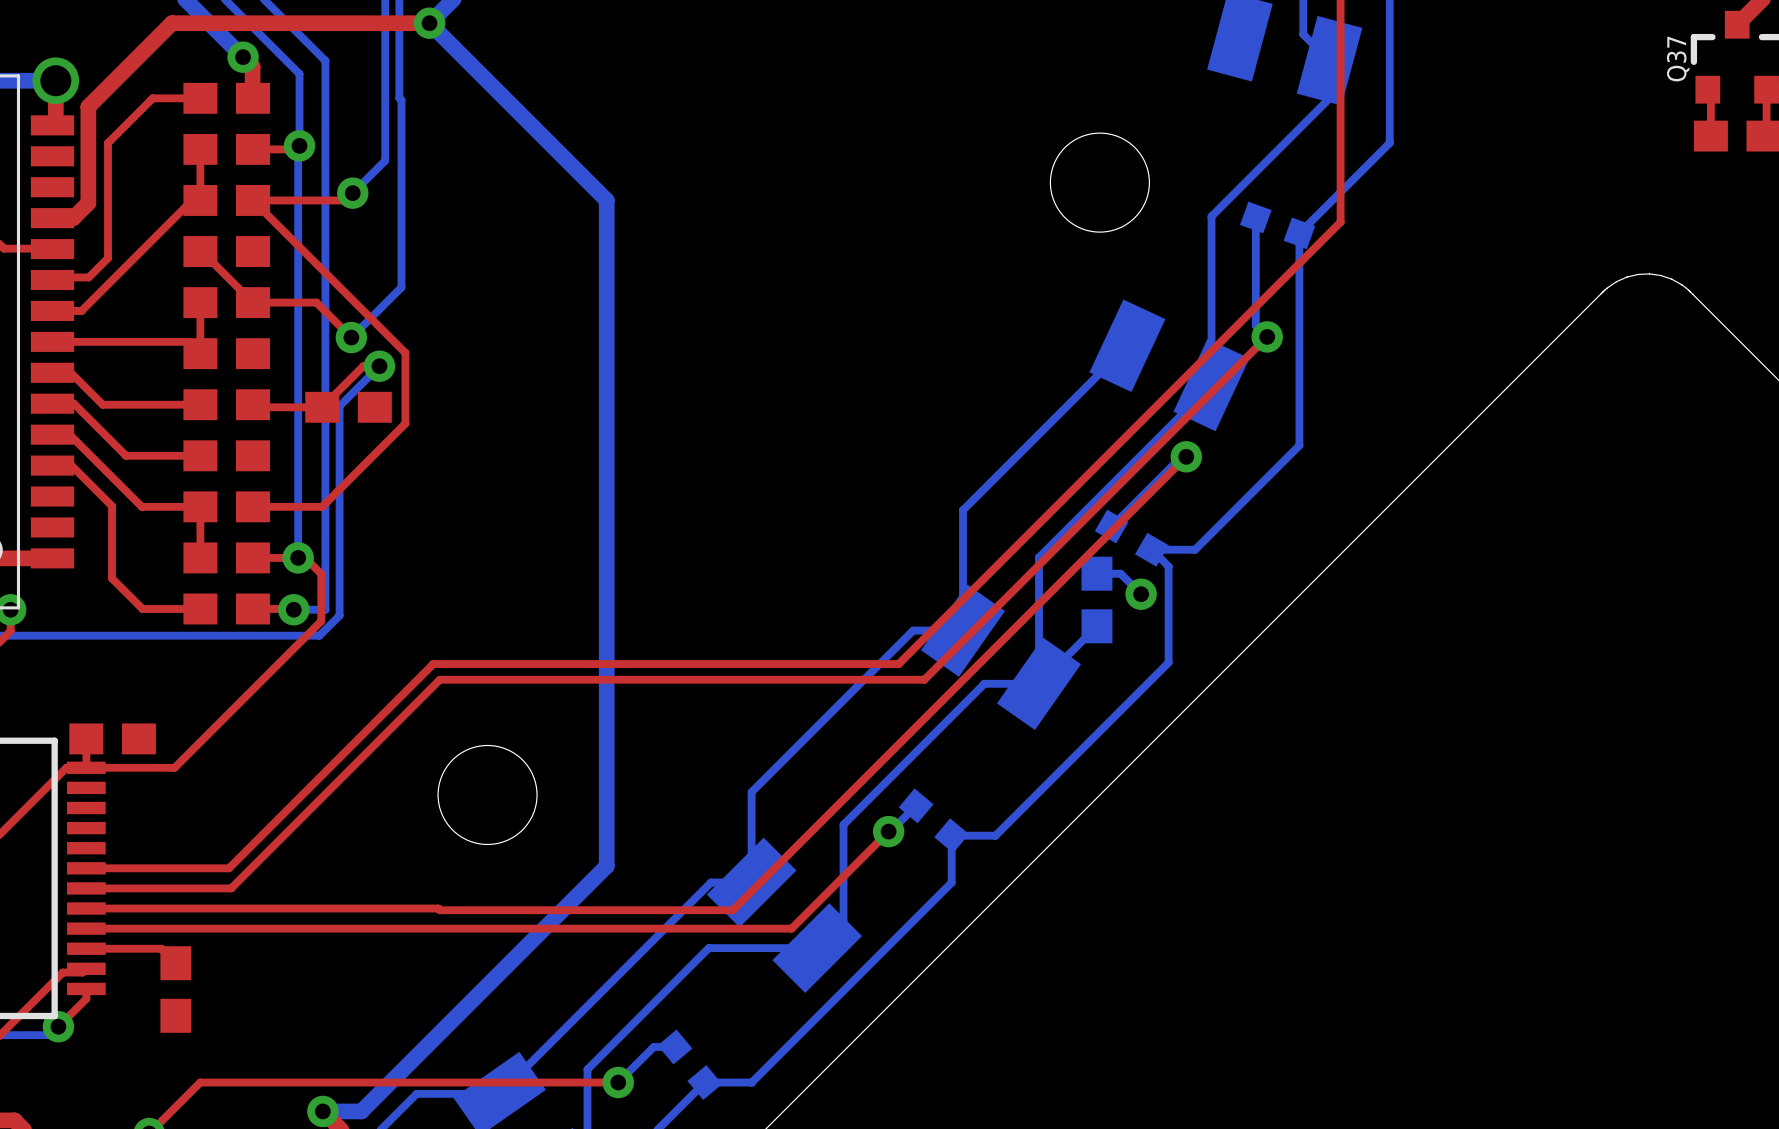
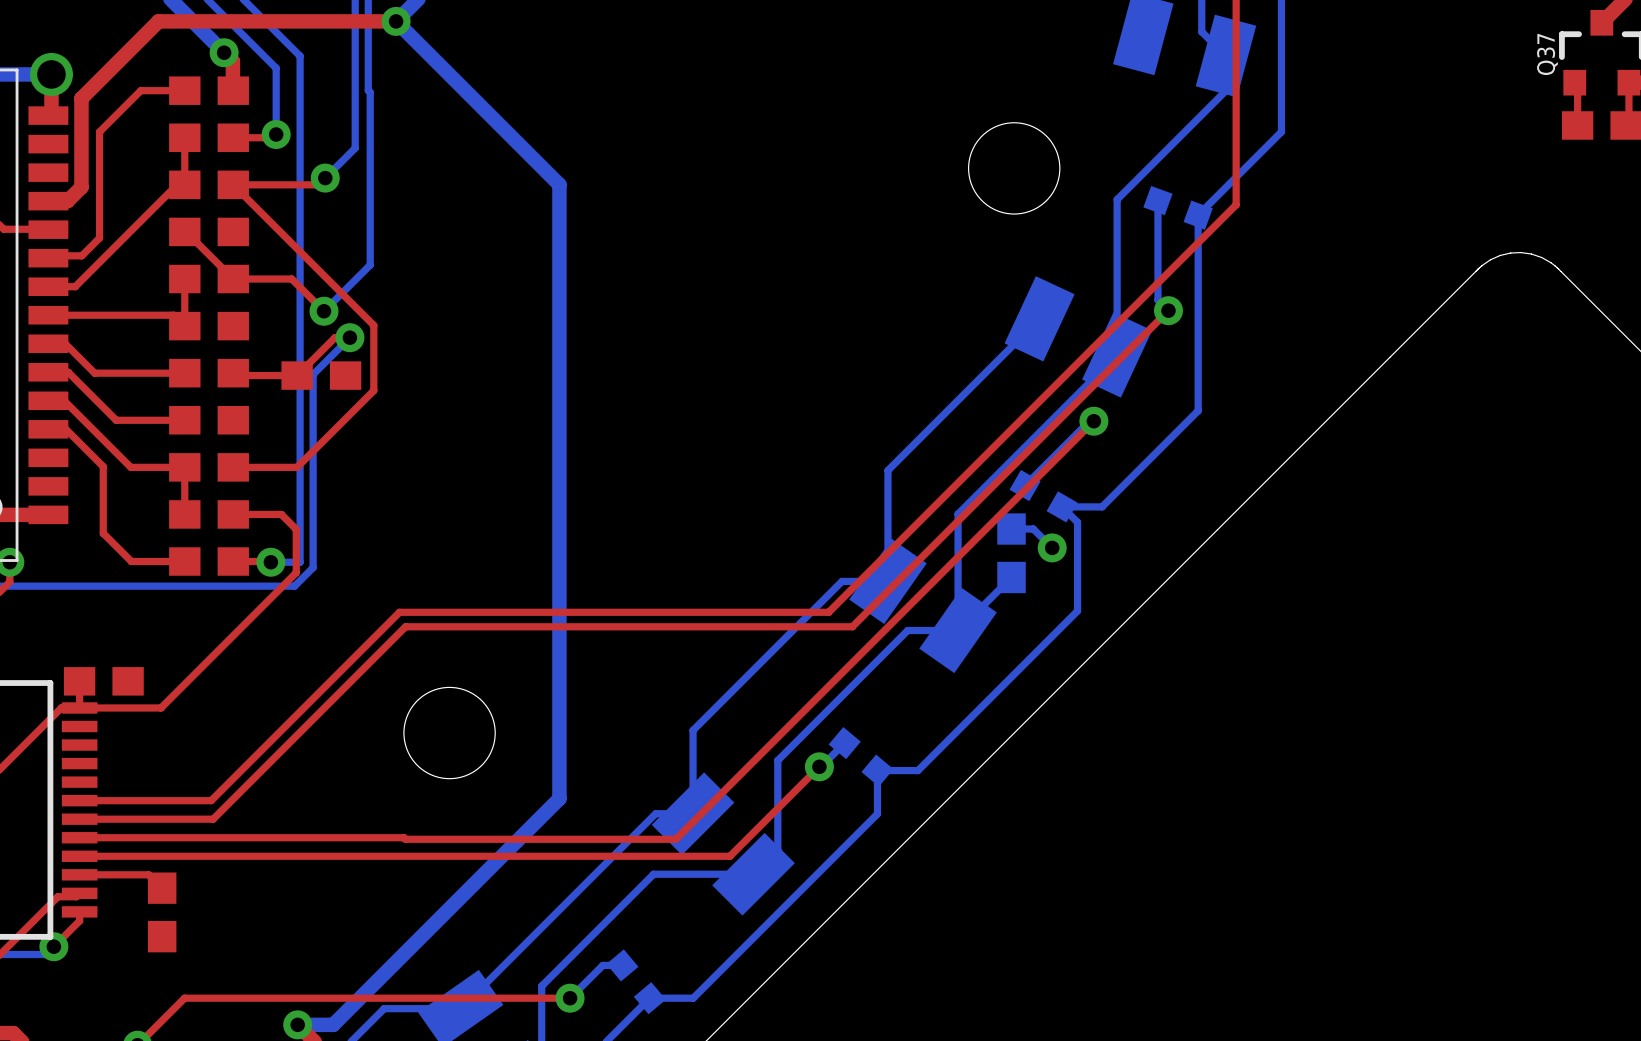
bottom track: (299, 145) (298, 557) -> none
via: (298, 557) -> none

